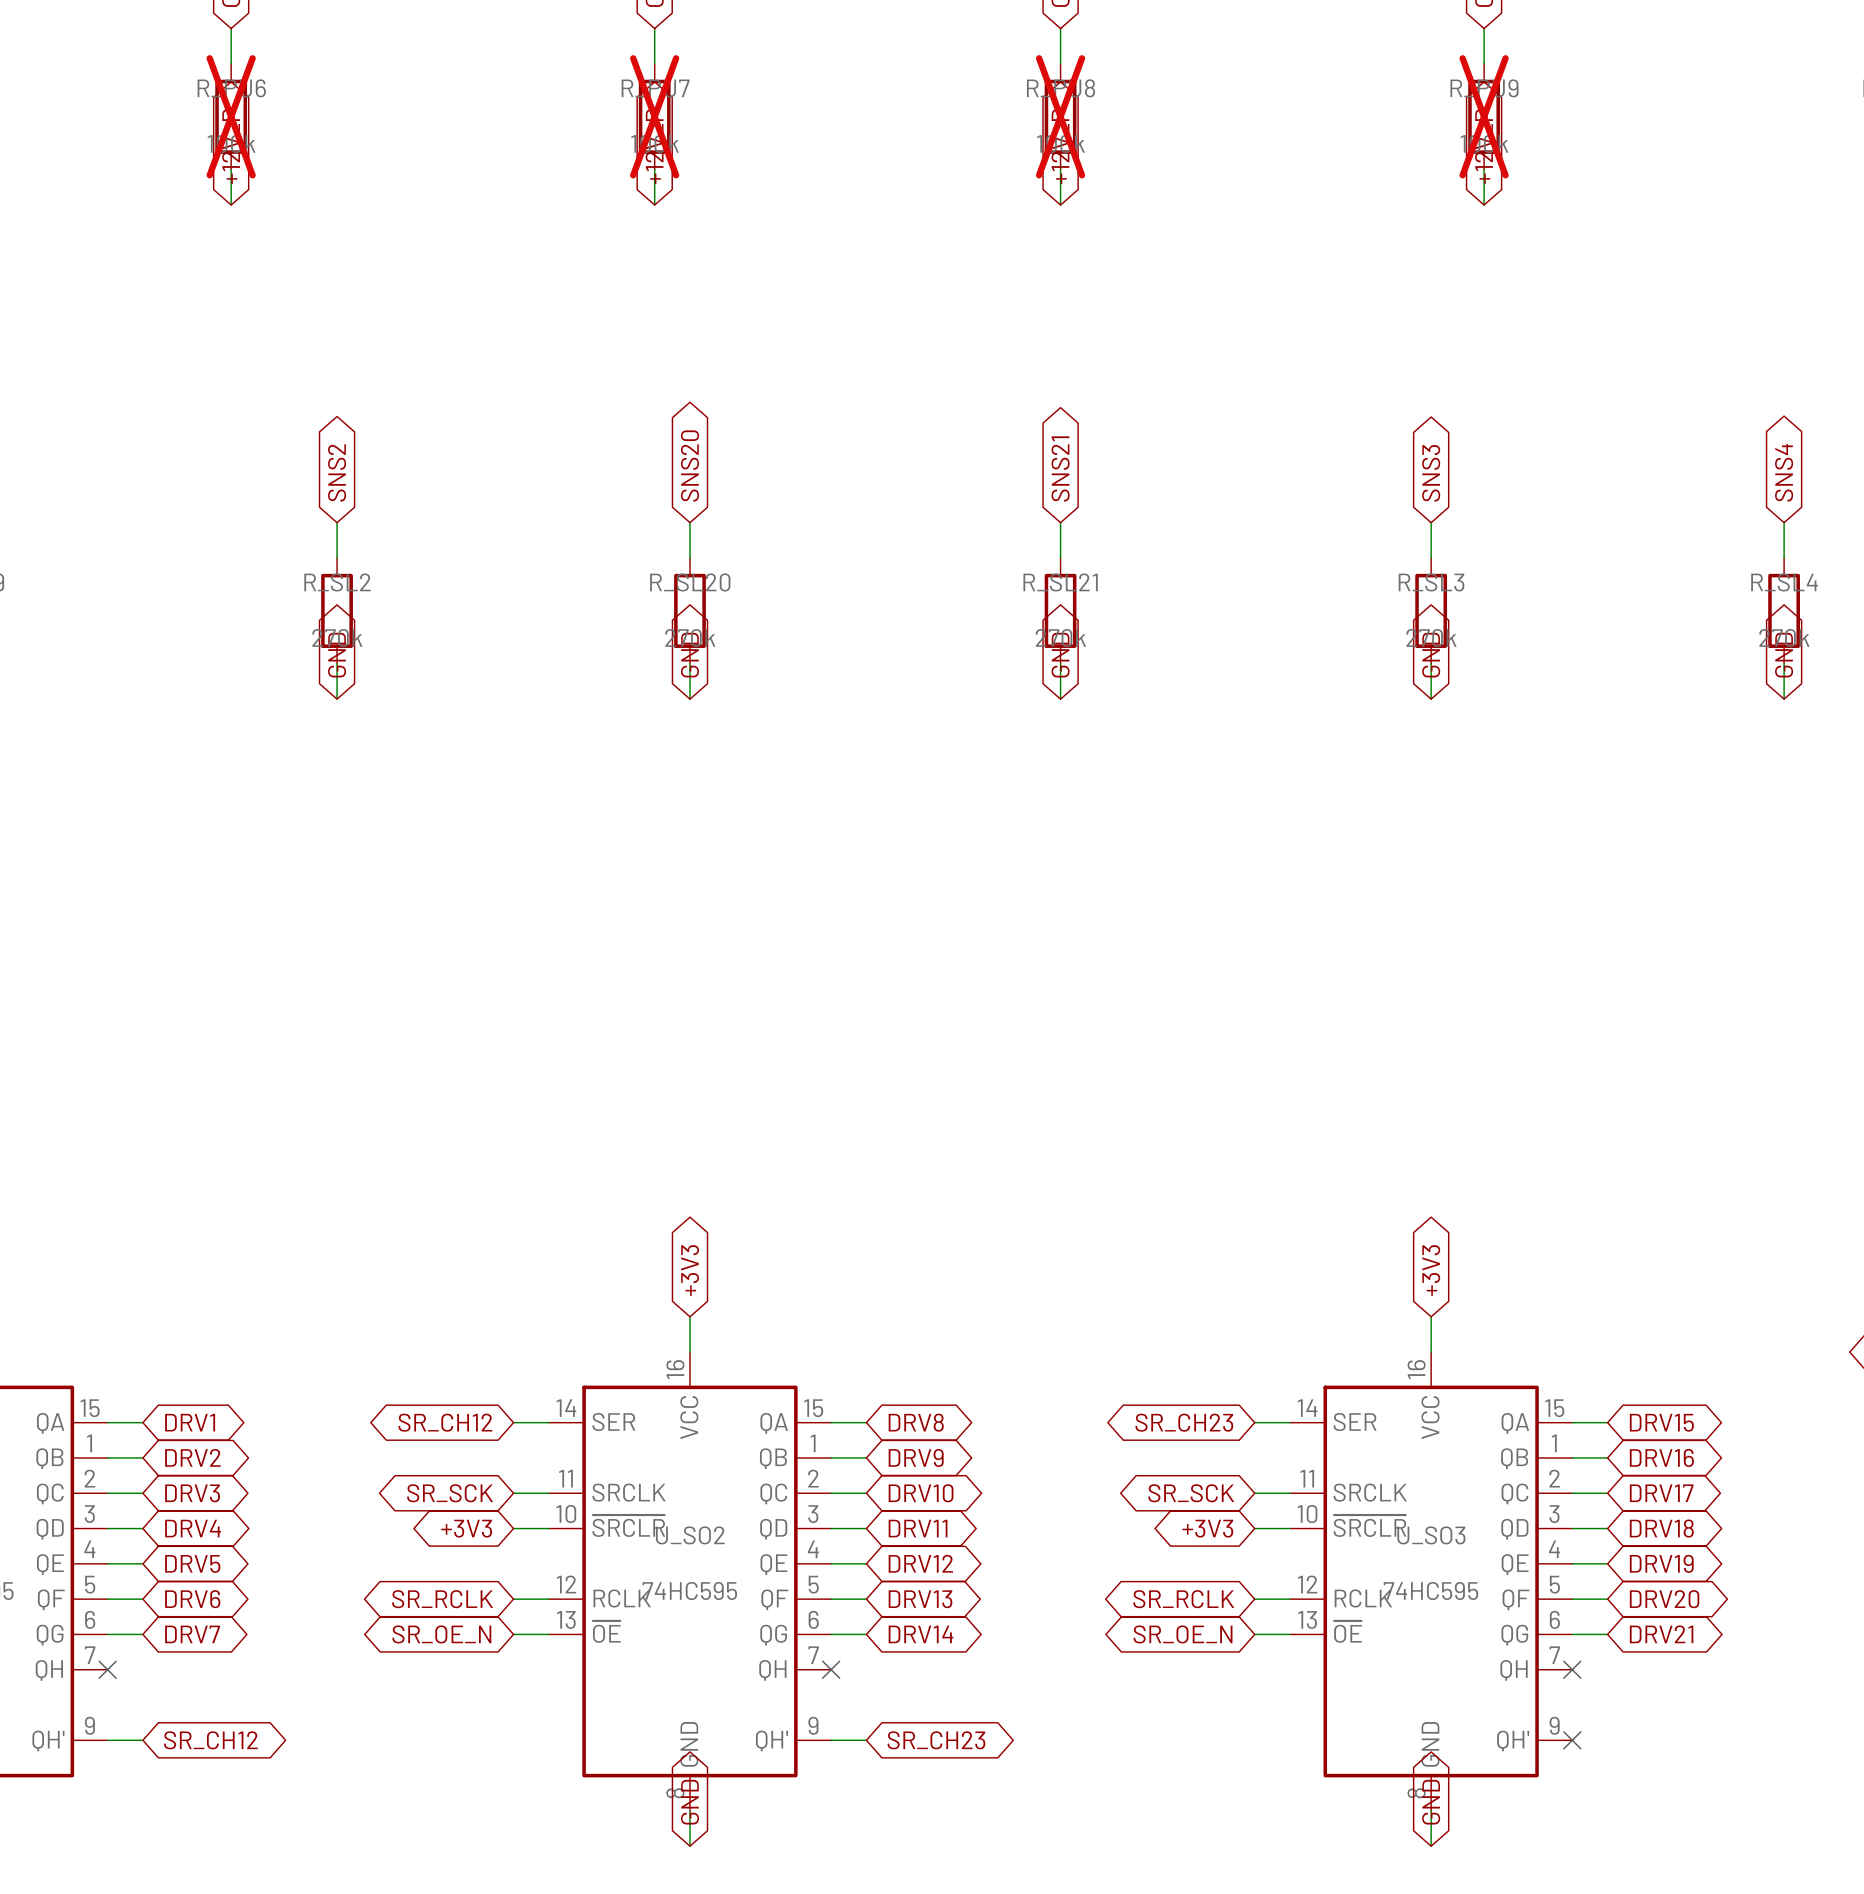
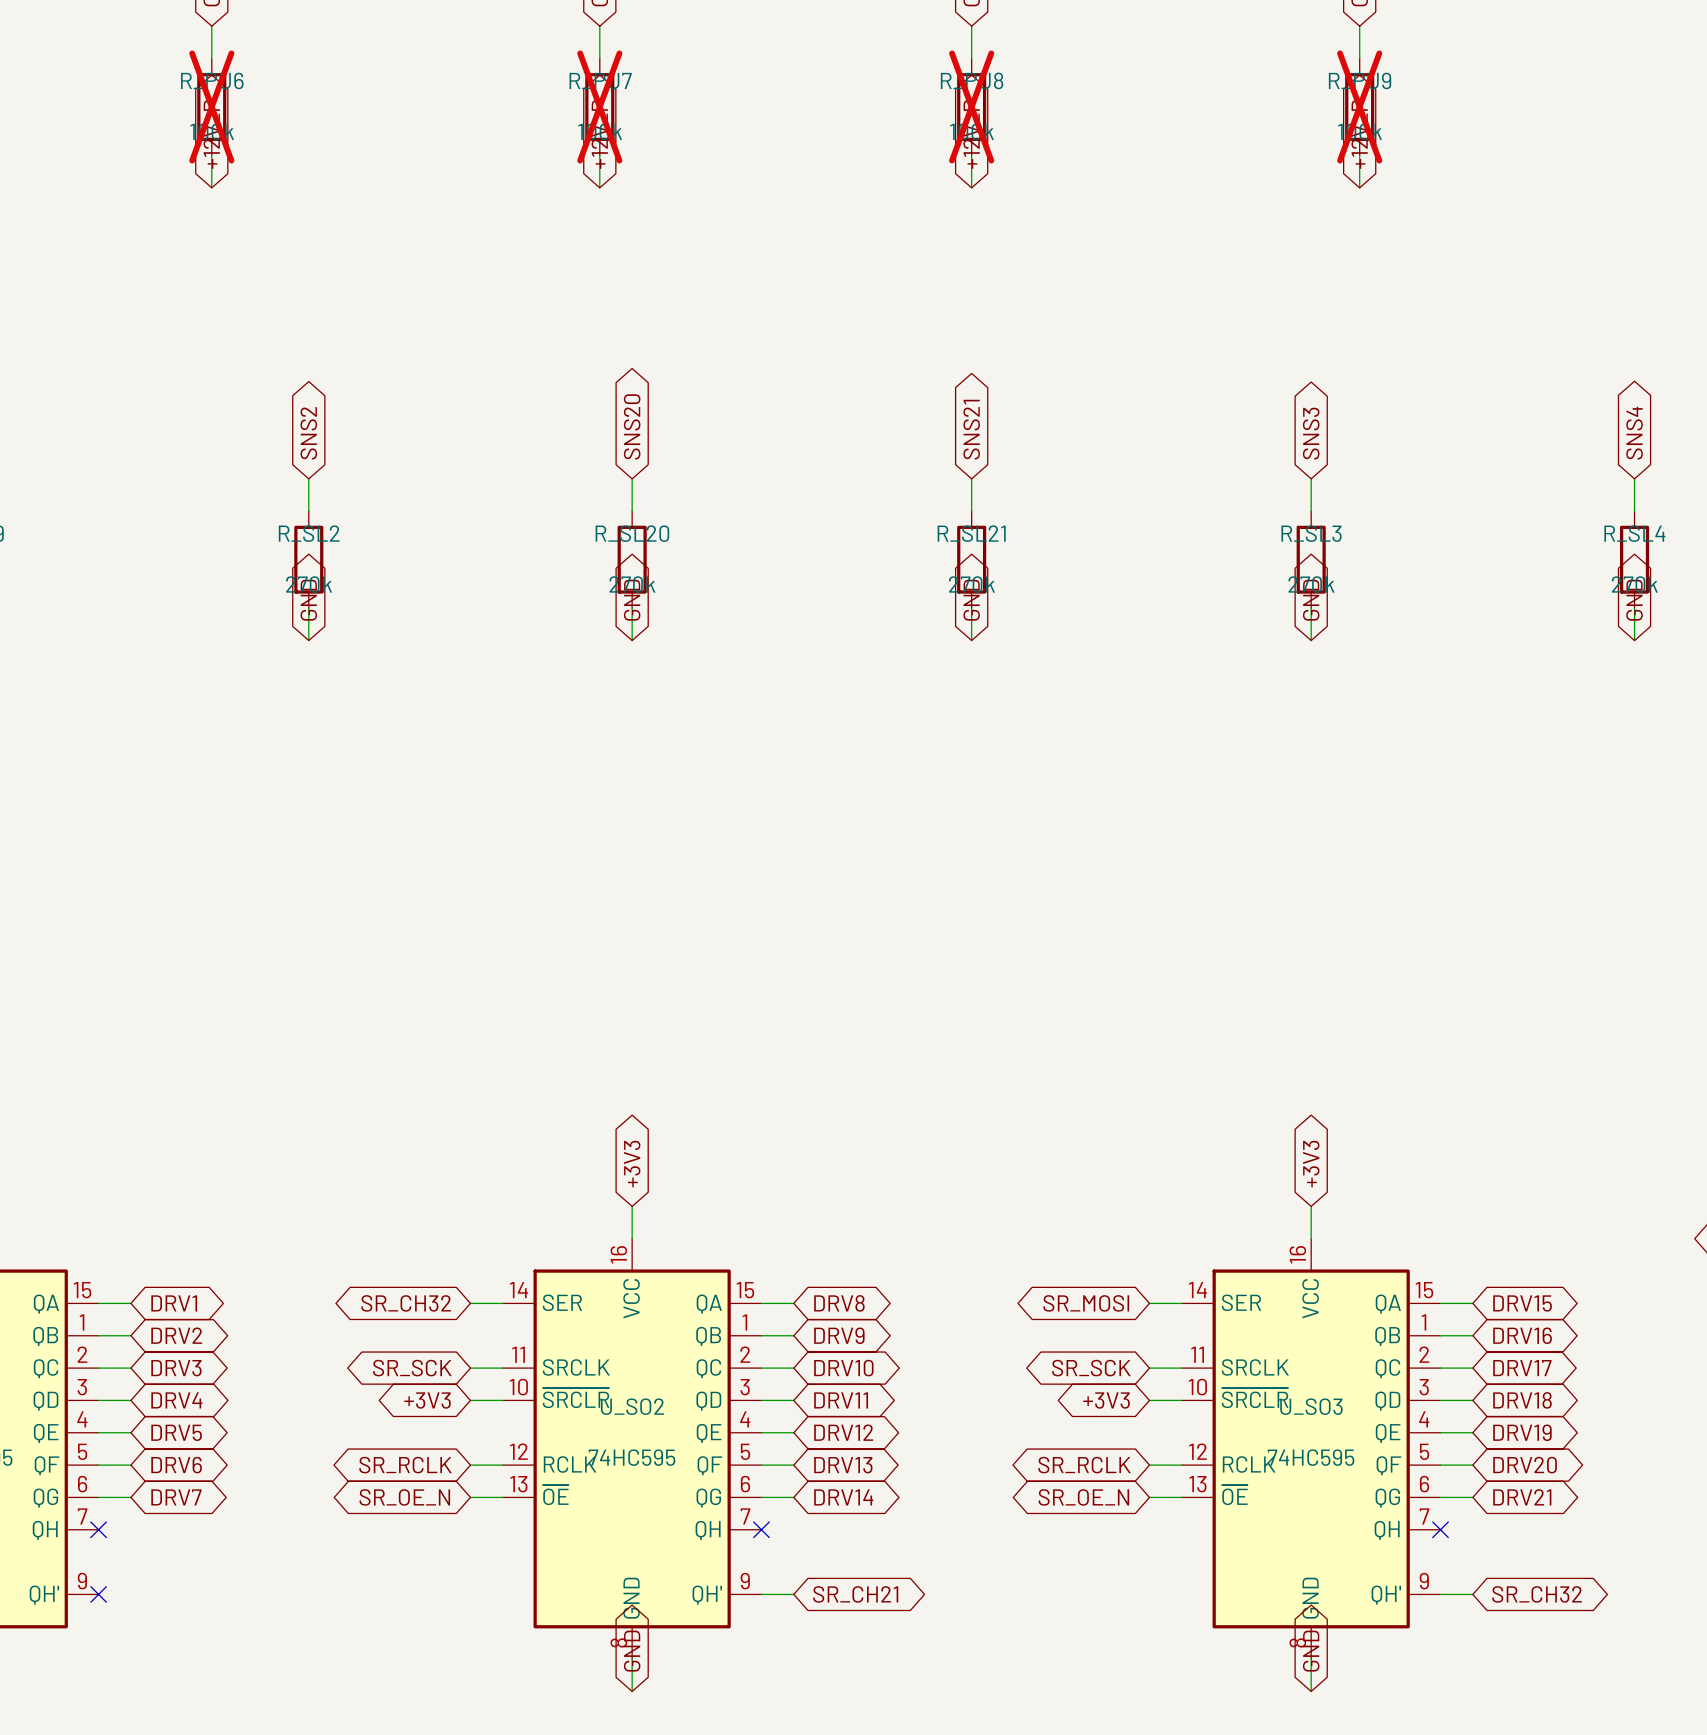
global label: SR_CH12 (445, 1422) -> SR_CH32 (406, 1303)
global label: SR_CH23 (1184, 1422) -> SR_MOSI (1086, 1303)
wire: (107, 1740) (142, 1740) -> none
no-connect mark: none -> (98, 1594)
global label: SR_CH12 (210, 1740) -> none
global label: SR_CH23 (936, 1740) -> SR_CH21 (855, 1594)
wire: none -> (1440, 1594) (1472, 1594)
no-connect mark: (1572, 1740) -> none
global label: none -> SR_CH32 (1537, 1594)

